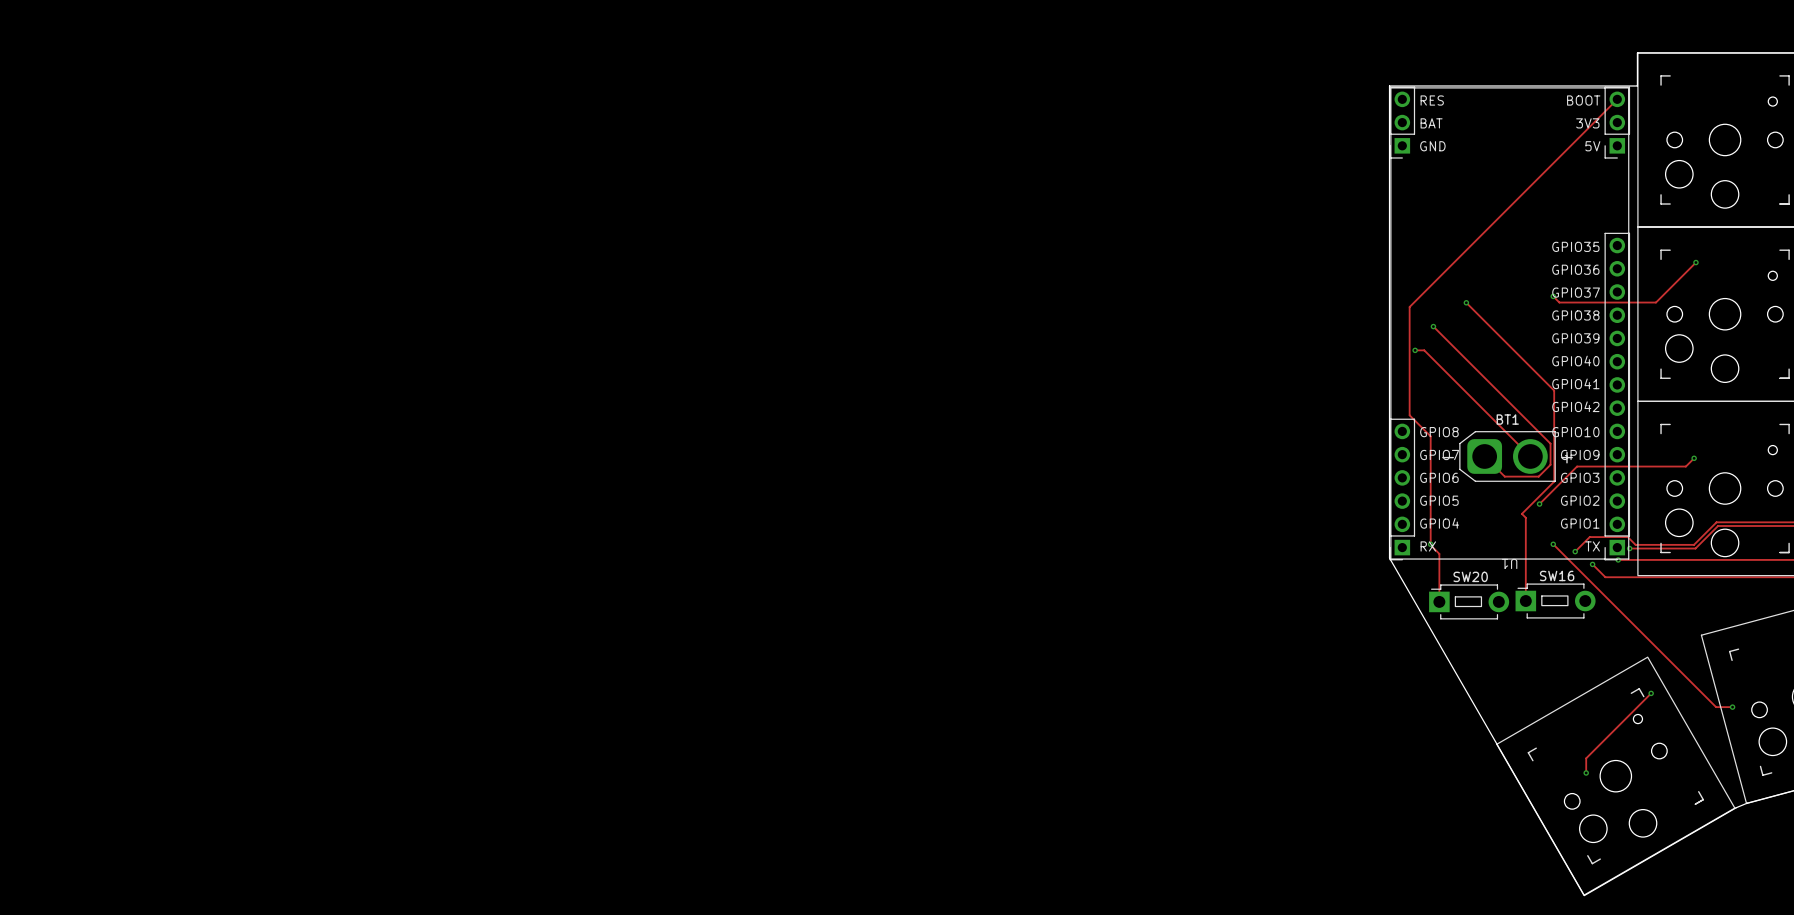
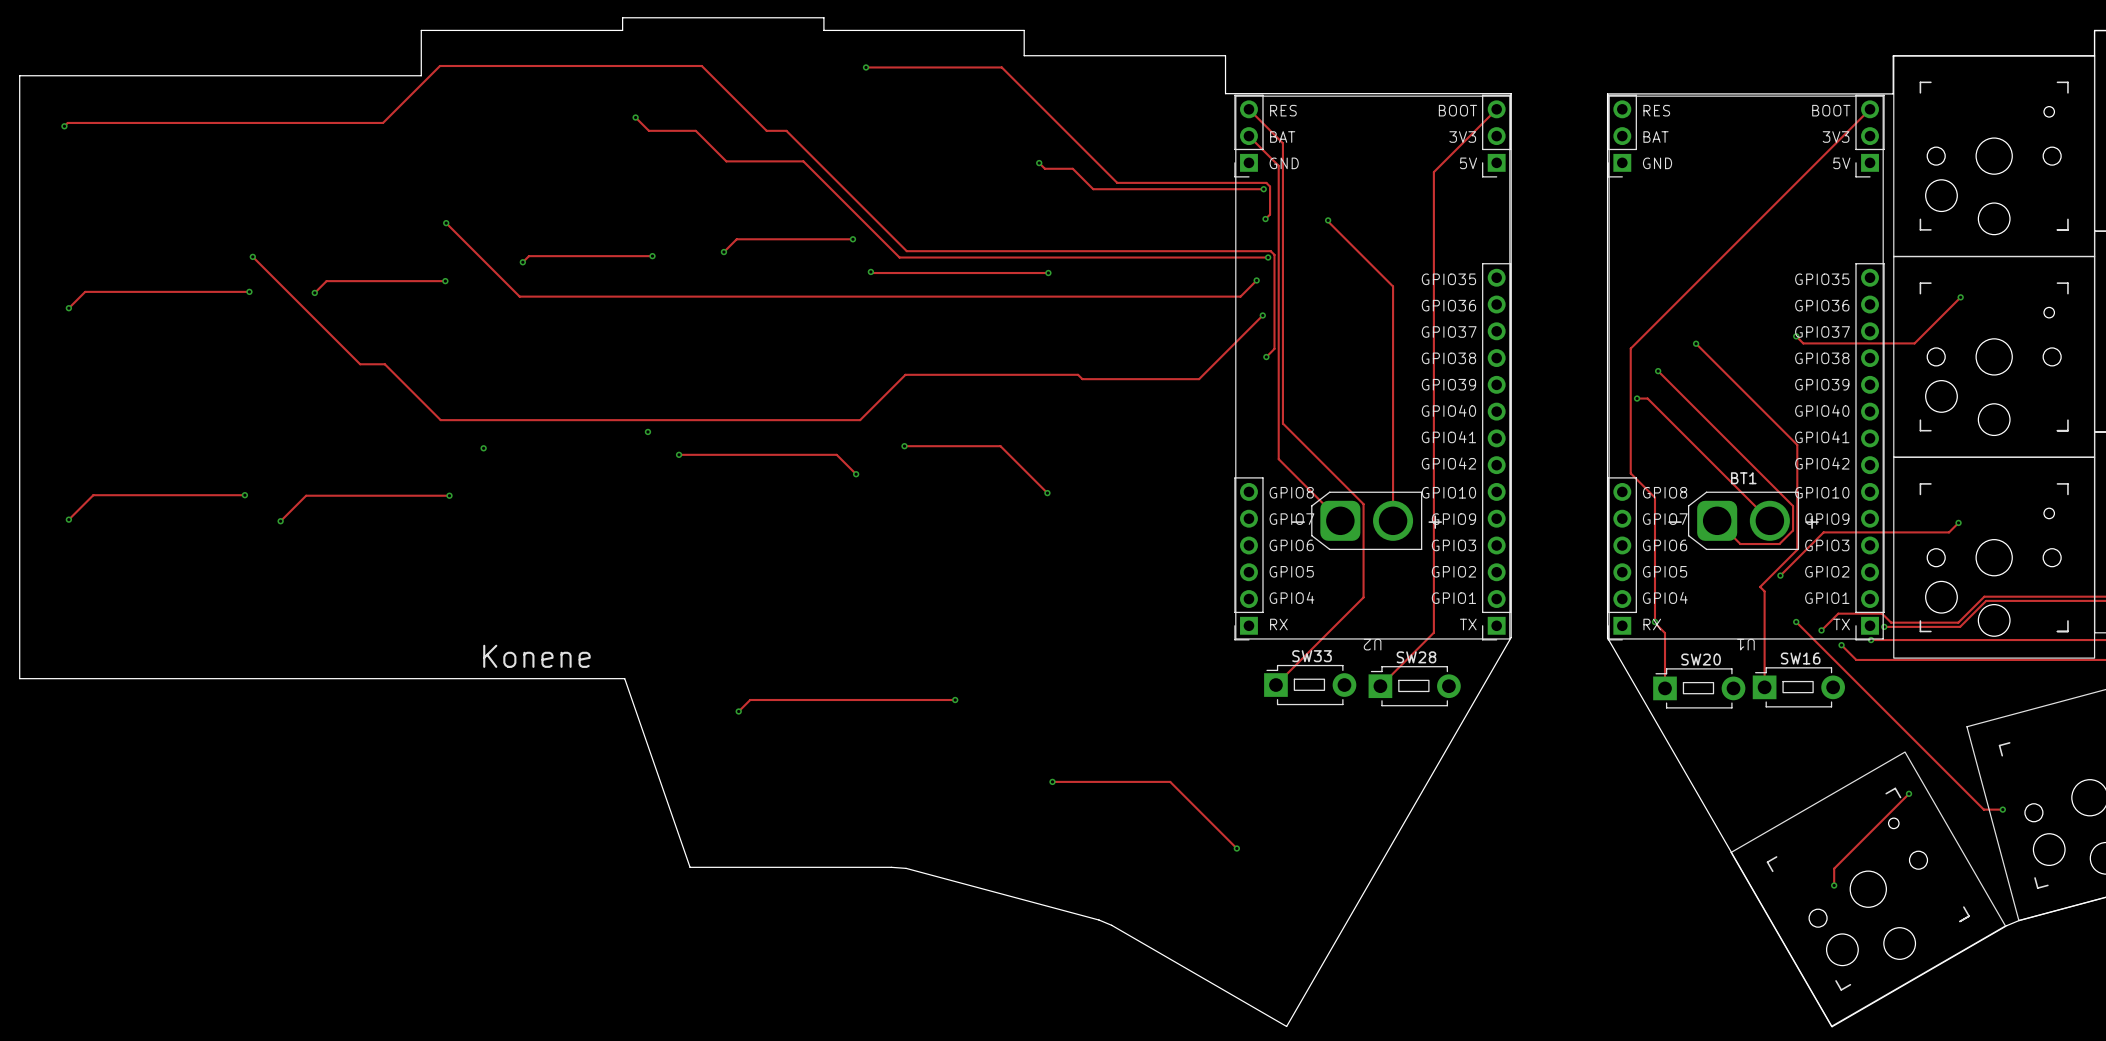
board edge: none -> (622, 17) (622, 30) (421, 30) (421, 75) (19, 75) (19, 678) (624, 678) (690, 867) (906, 868) (1099, 920) (1111, 925) (1286, 1026) (1511, 637) (1511, 93) (1225, 93) (1225, 55) (1024, 55) (1024, 30) (823, 30) (823, 17) (622, 17)
track: none -> (866, 67) (1001, 67) (1117, 182) (1266, 182) (1270, 186) (1270, 214) (1265, 219)
via: none -> (866, 67)
track: none -> (1248, 109) (1282, 143) (1282, 423) (1363, 504) (1363, 597) (1275, 685)
track: none -> (1496, 109) (1433, 172) (1433, 632) (1380, 686)
track: none -> (635, 117) (648, 130) (695, 130) (726, 161) (803, 161) (899, 257) (1268, 257)
via: none -> (635, 117)
track: none -> (64, 126) (67, 122) (383, 122) (440, 65) (701, 65) (766, 130) (786, 130) (906, 251) (1270, 251) (1274, 254) (1274, 348) (1266, 357)
via: none -> (64, 126)
track: none -> (1248, 136) (1278, 165) (1278, 459) (1340, 520)
track: none -> (1039, 163) (1044, 168) (1072, 168) (1093, 189) (1263, 189)
via: none -> (1039, 163)
via: none -> (1263, 189)
via: none -> (1265, 219)
track: none -> (1328, 220) (1393, 286) (1393, 520)
via: none -> (1328, 220)
track: none -> (446, 223) (519, 296) (1240, 296) (1256, 280)
via: none -> (446, 223)
track: none -> (852, 239) (736, 239) (723, 252)
via: none -> (852, 239)
via: none -> (723, 252)
track: none -> (652, 256) (528, 256) (522, 262)
via: none -> (652, 256)
track: none -> (252, 256) (360, 364) (384, 364) (440, 420) (860, 420) (905, 374) (1078, 374) (1082, 379) (1199, 379) (1262, 315)
via: none -> (252, 256)
via: none -> (1268, 257)
via: none -> (522, 262)
track: none -> (870, 271) (1048, 273)
via: none -> (870, 271)
via: none -> (1048, 273)
via: none -> (1256, 280)
track: none -> (445, 281) (326, 281) (314, 292)
via: none -> (445, 281)
track: none -> (249, 291) (85, 291) (68, 308)
via: none -> (249, 291)
via: none -> (314, 292)
via: none -> (68, 308)
via: none -> (1262, 315)
via: none -> (1266, 357)
U2: none -> (1372, 367)
via: none -> (647, 431)
track: none -> (904, 446) (1000, 446) (1047, 493)
via: none -> (904, 446)
via: none -> (483, 448)
track: none -> (679, 454) (836, 454) (856, 474)
via: none -> (679, 454)
via: none -> (856, 474)
via: none -> (1047, 493)
track: none -> (244, 495) (93, 495) (68, 519)
via: none -> (244, 495)
track: none -> (449, 495) (306, 495) (280, 521)
via: none -> (449, 495)
via: none -> (68, 519)
via: none -> (280, 521)
part: none -> (1366, 520)
text: none -> Konene (536, 656)
SW33: none -> (1310, 685)
SW28: none -> (1414, 686)
track: none -> (955, 700) (750, 700) (738, 711)
via: none -> (955, 700)
via: none -> (738, 711)
track: none -> (1052, 781) (1170, 781) (1236, 848)
via: none -> (1052, 781)
via: none -> (1236, 848)

